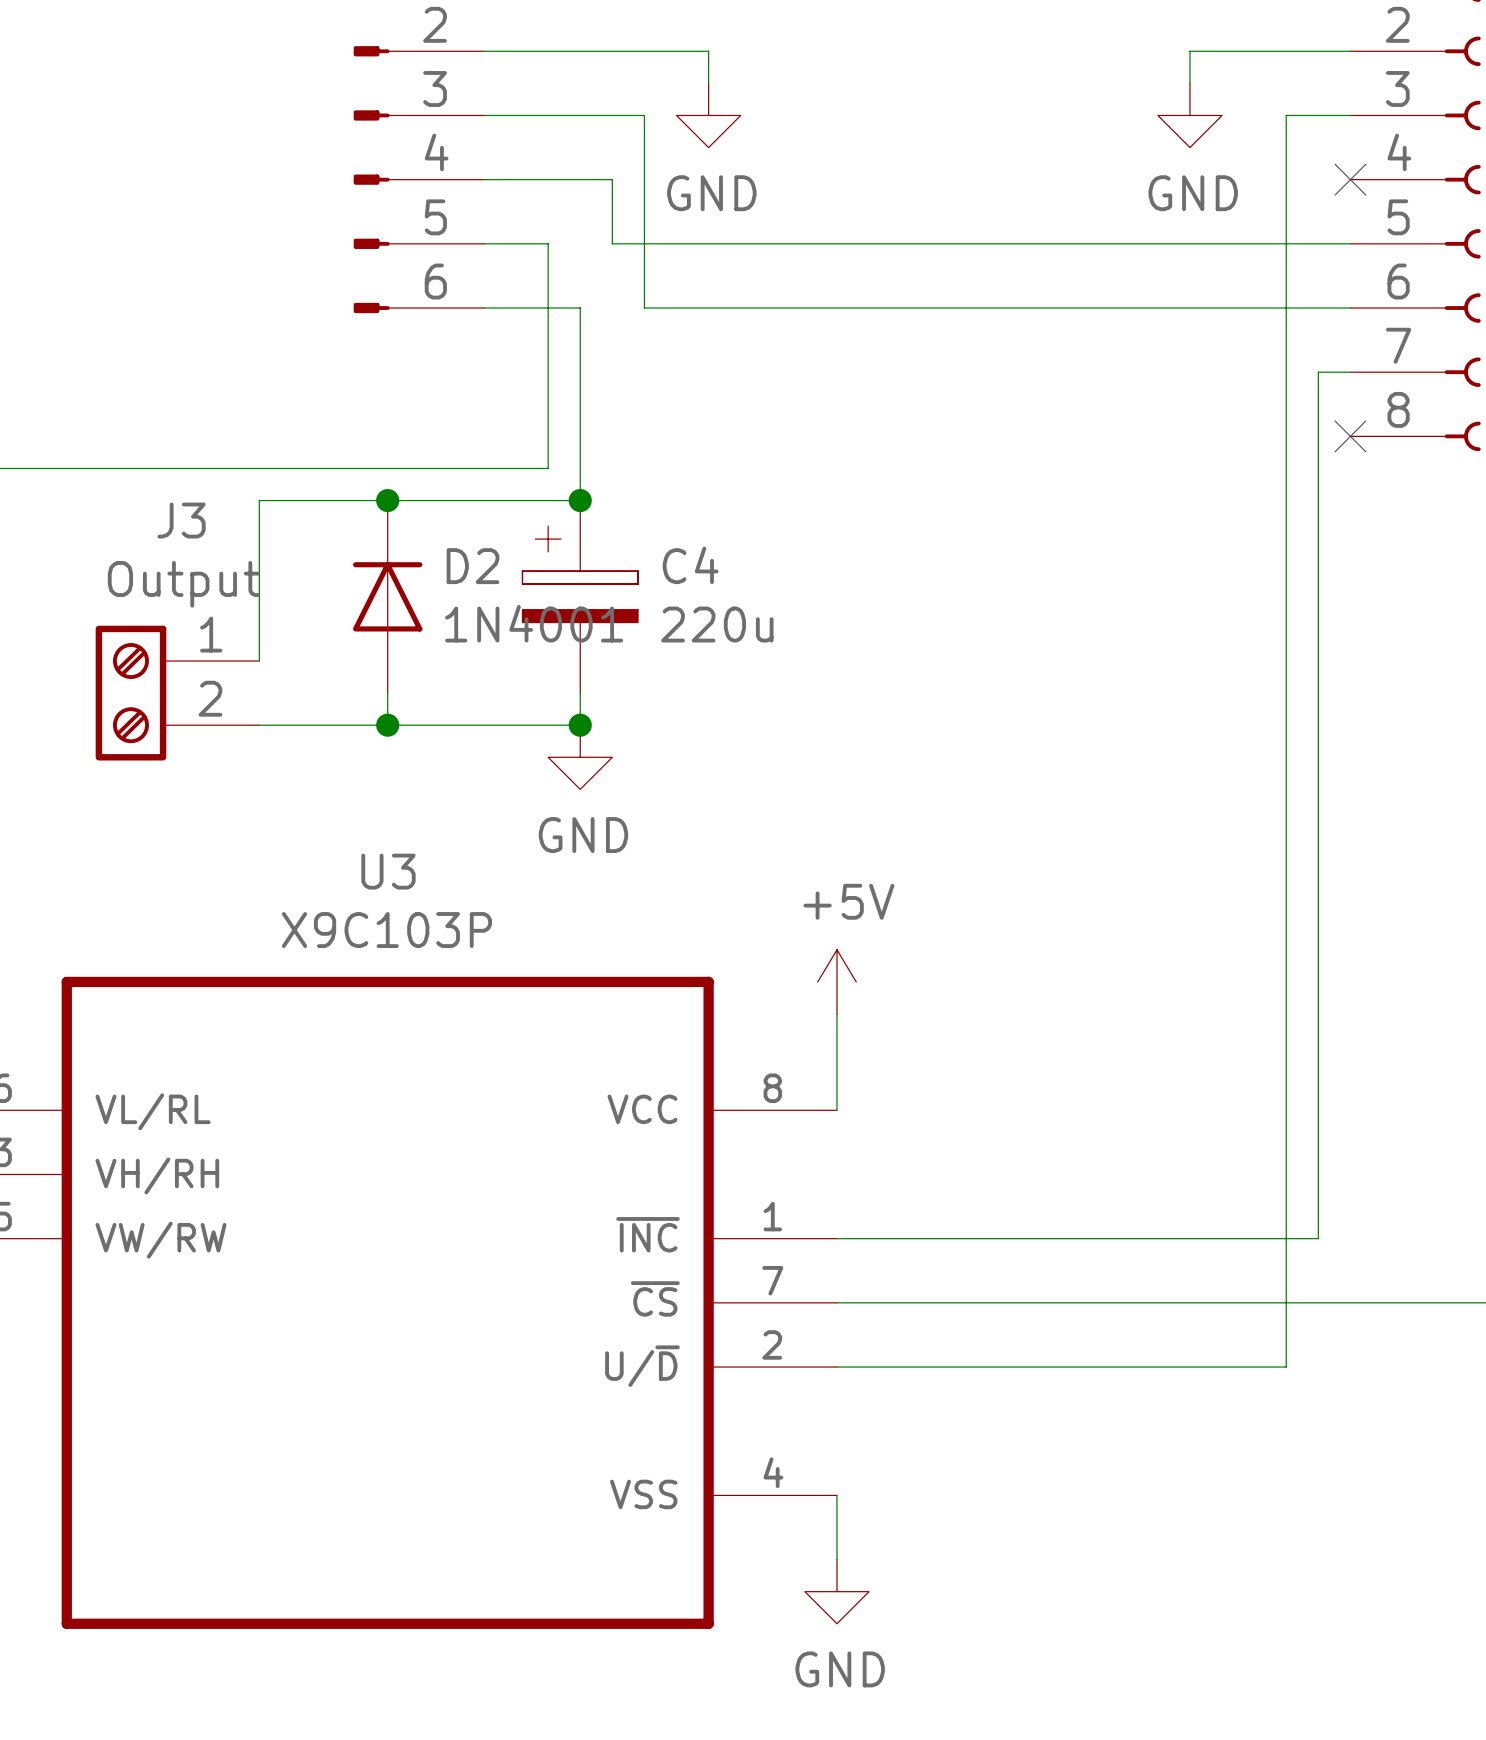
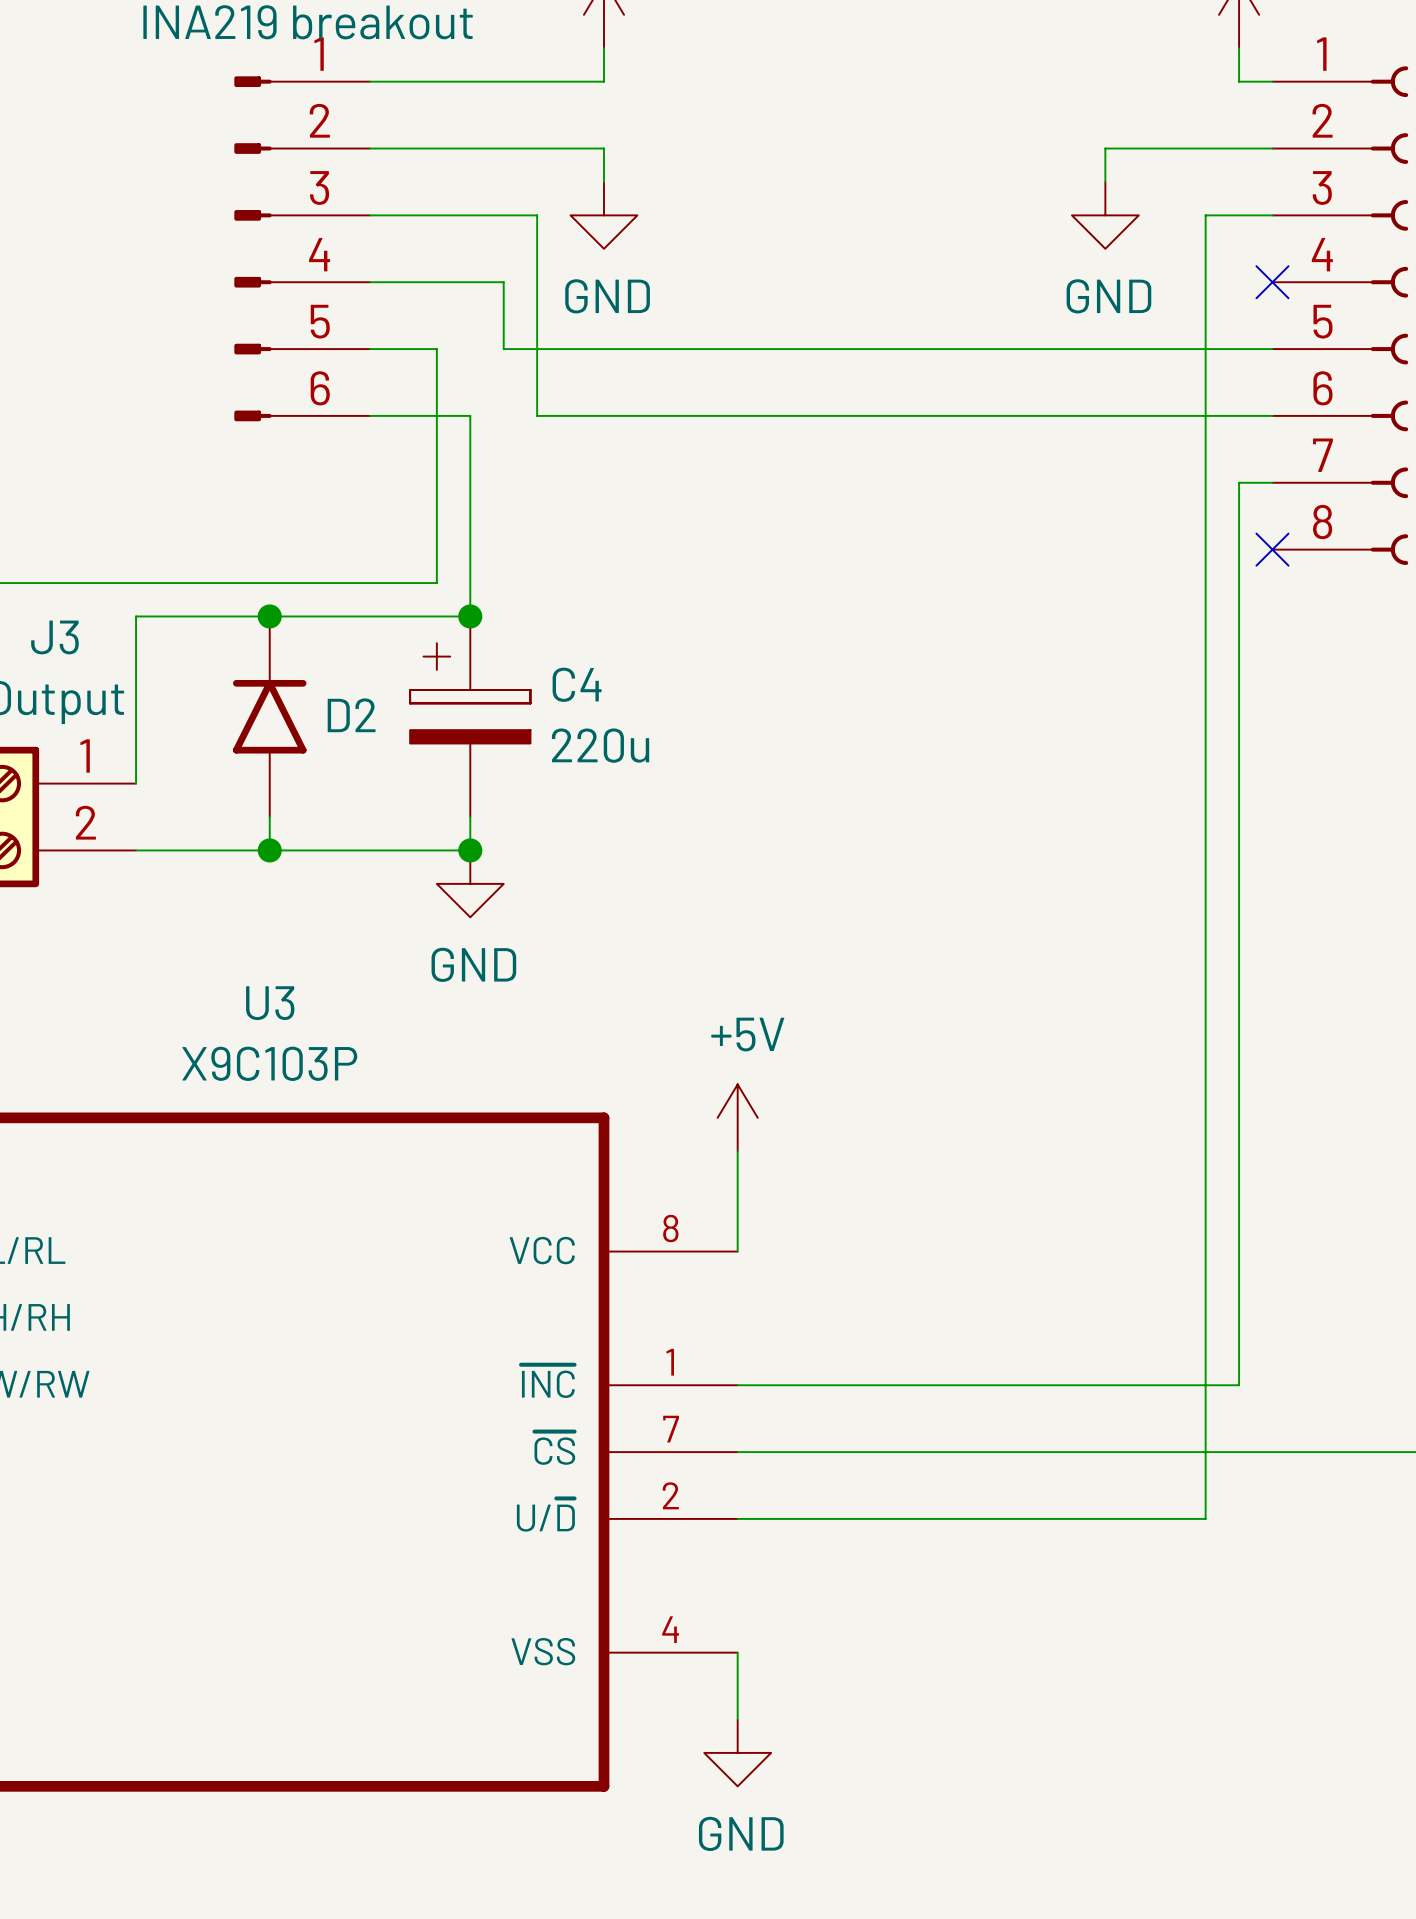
D2 symbol: [353, 500, 423, 694] -> [232, 616, 307, 818]
D2 name position: D2 (473, 566) -> D2 (351, 715)
D2 value: 1N4001 (534, 623) -> none

